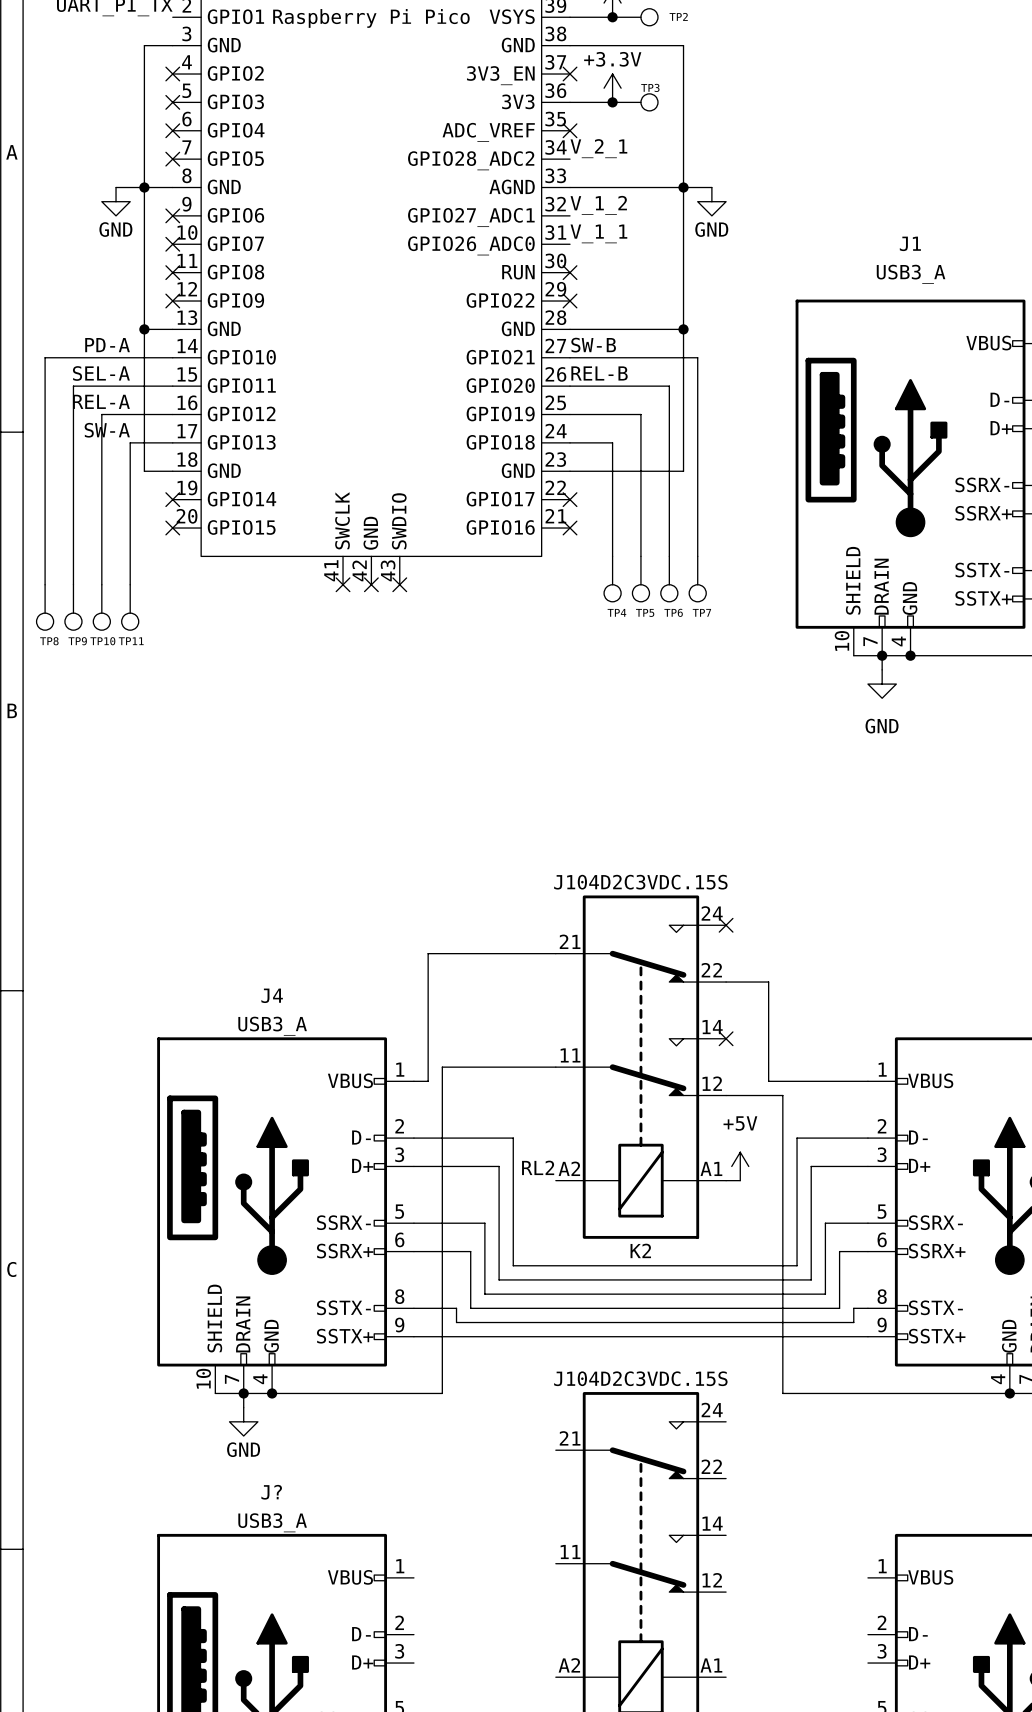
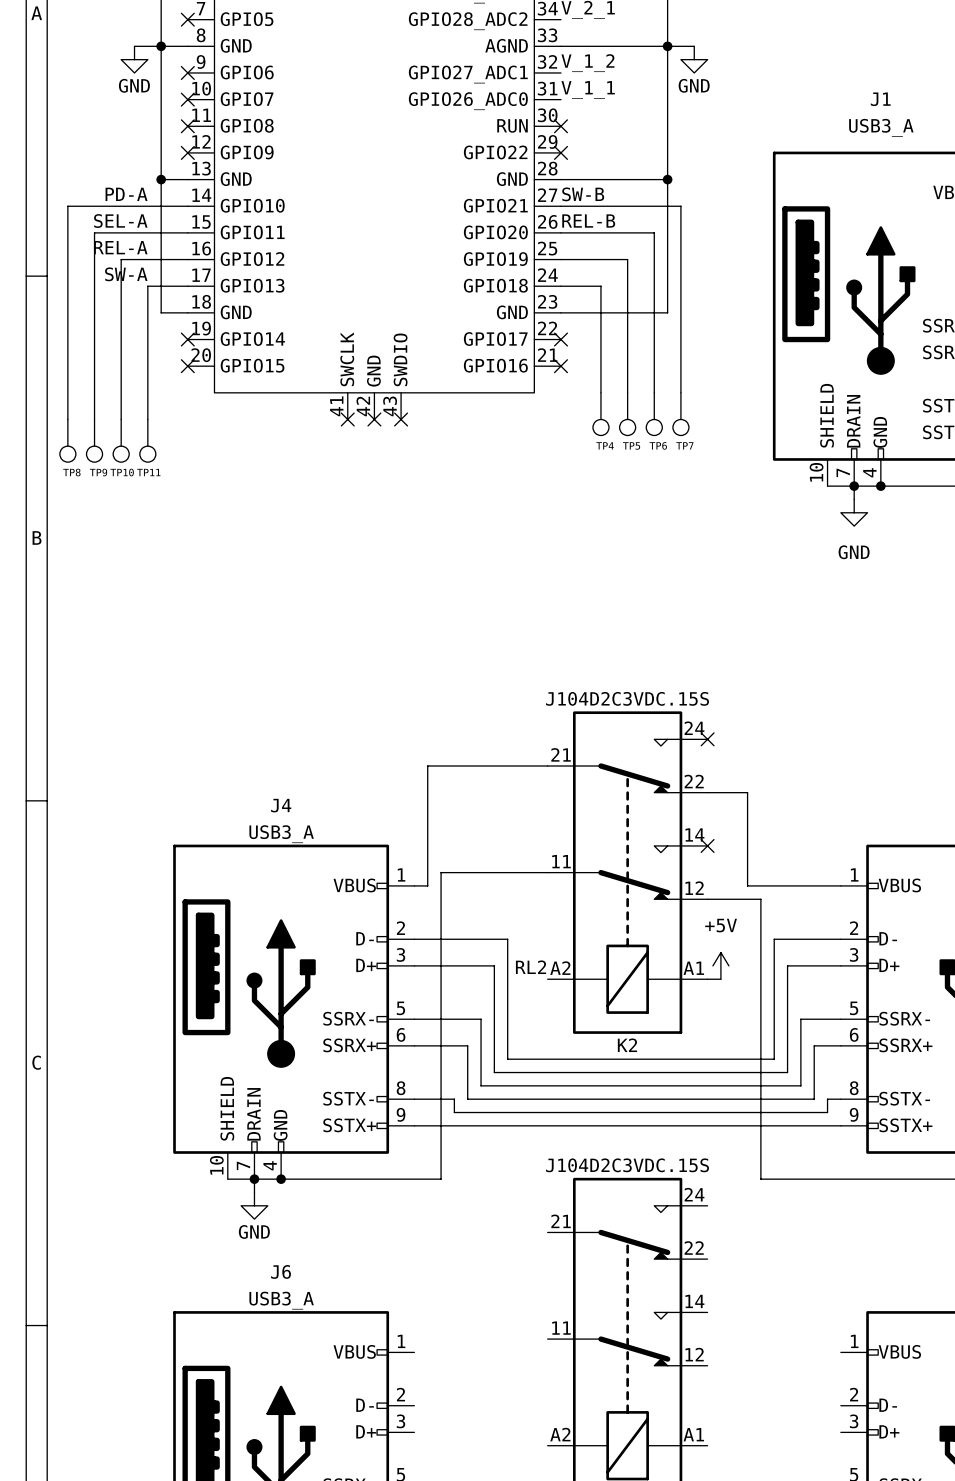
J? name: J? (271, 1492) -> J6 (281, 1271)

